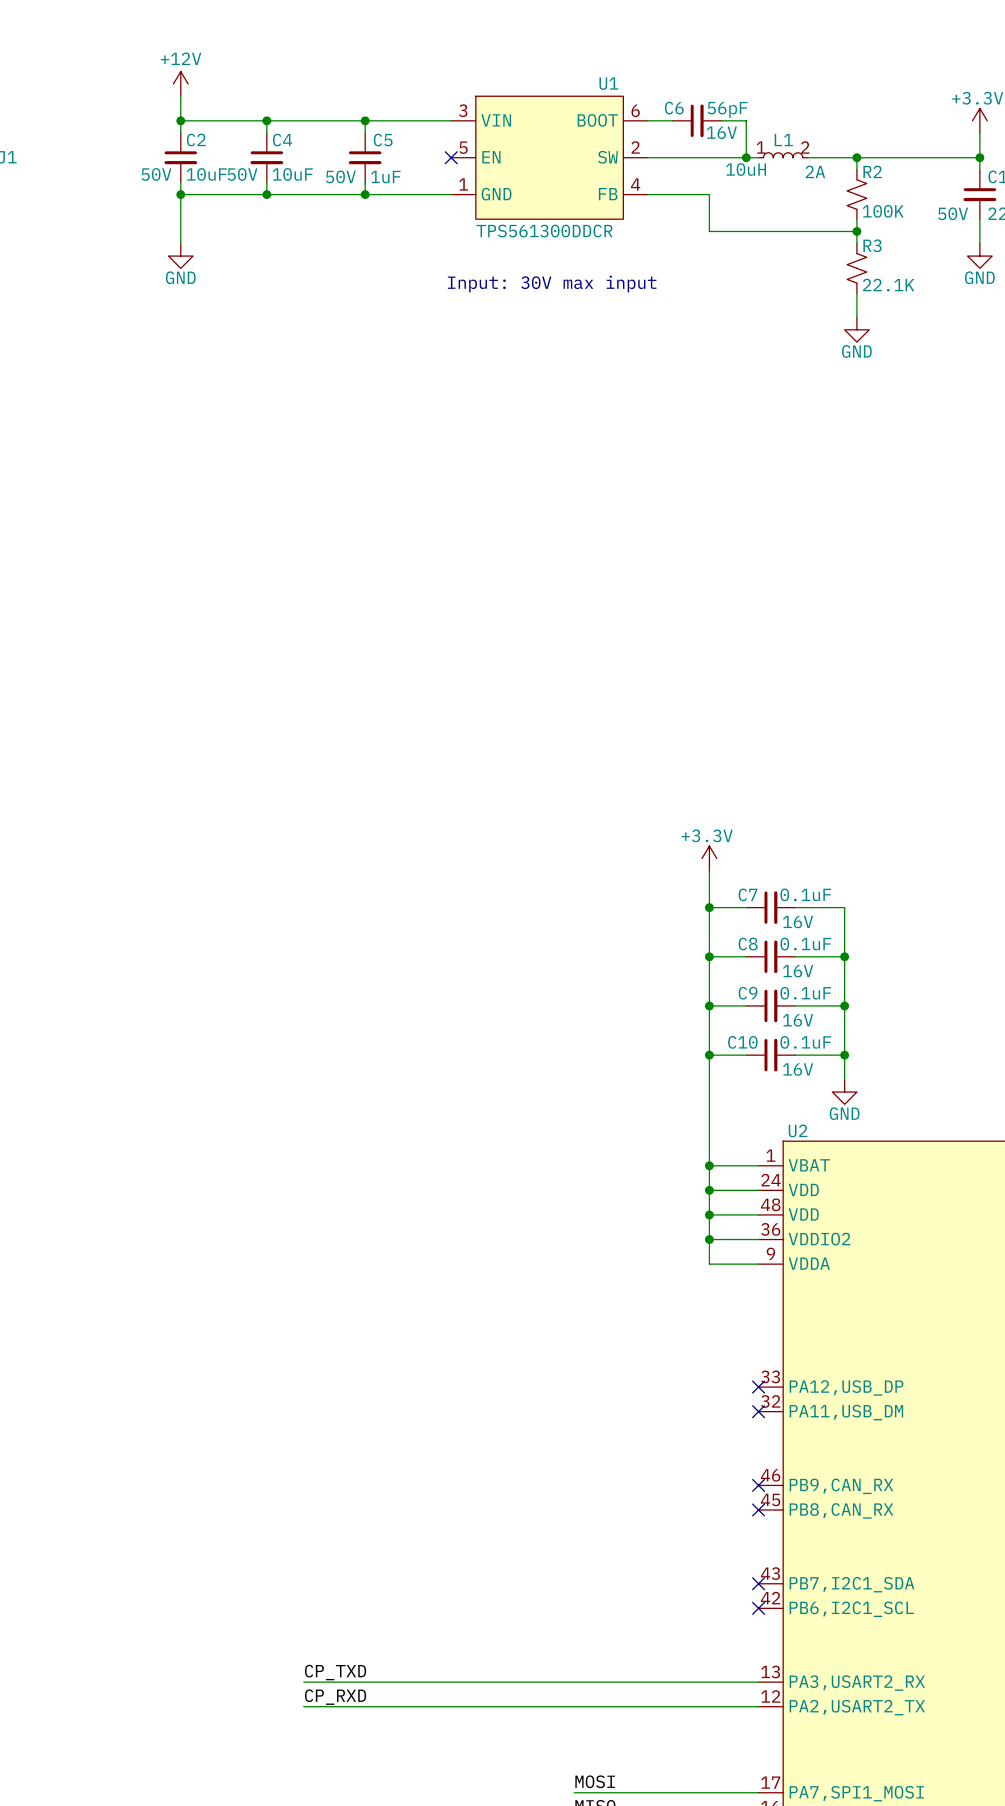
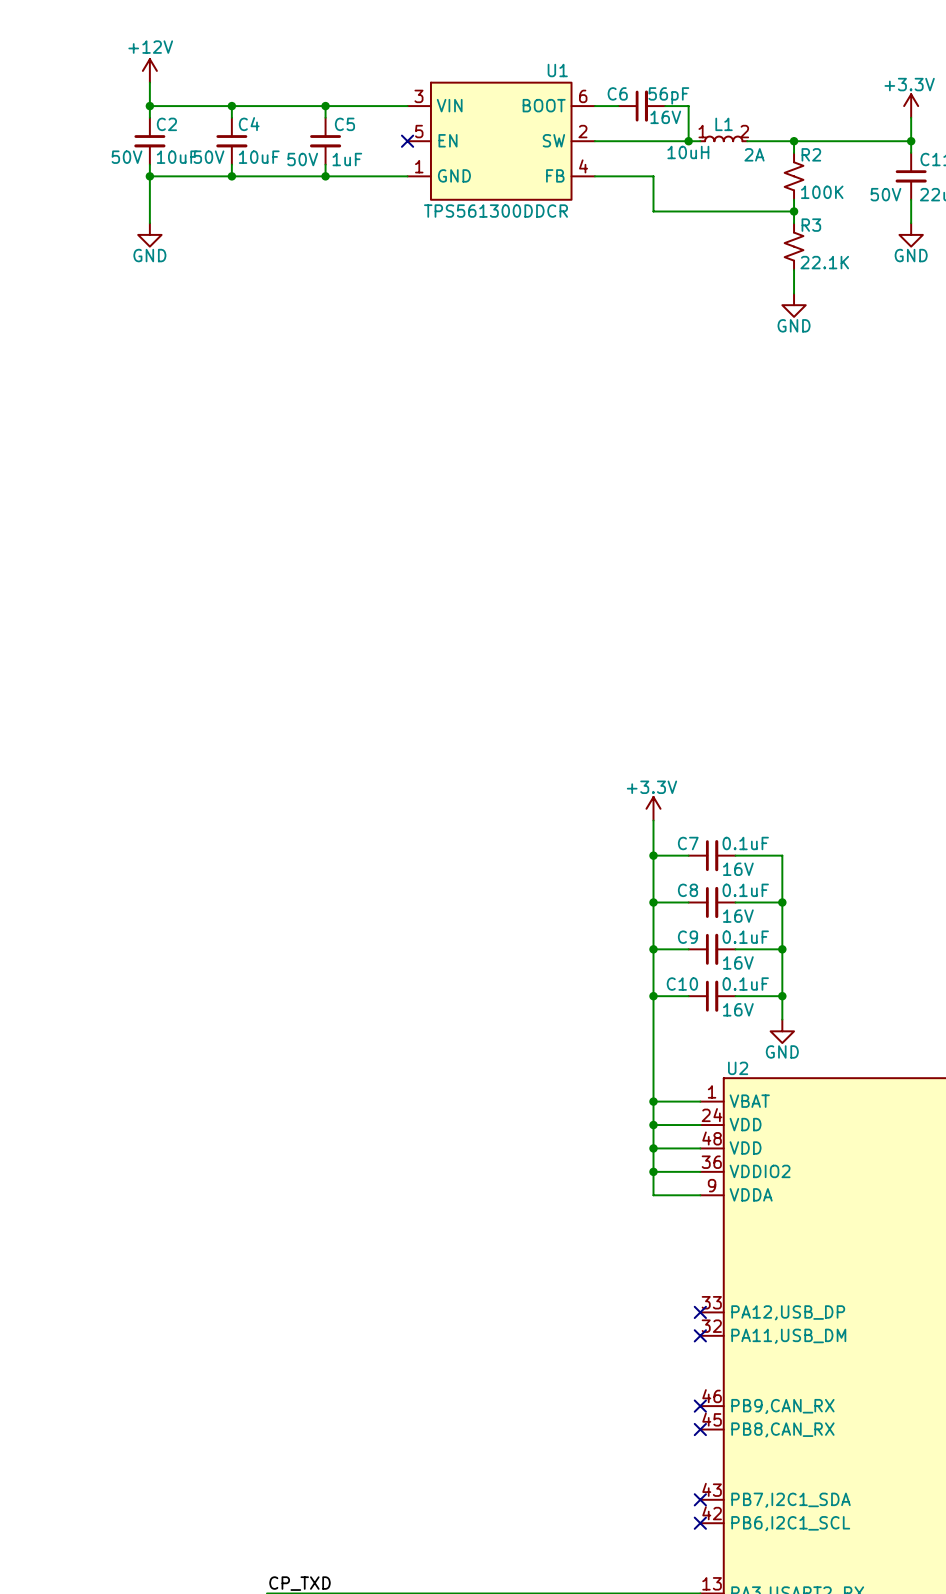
text: Input: 30V max input (552, 284) -> none

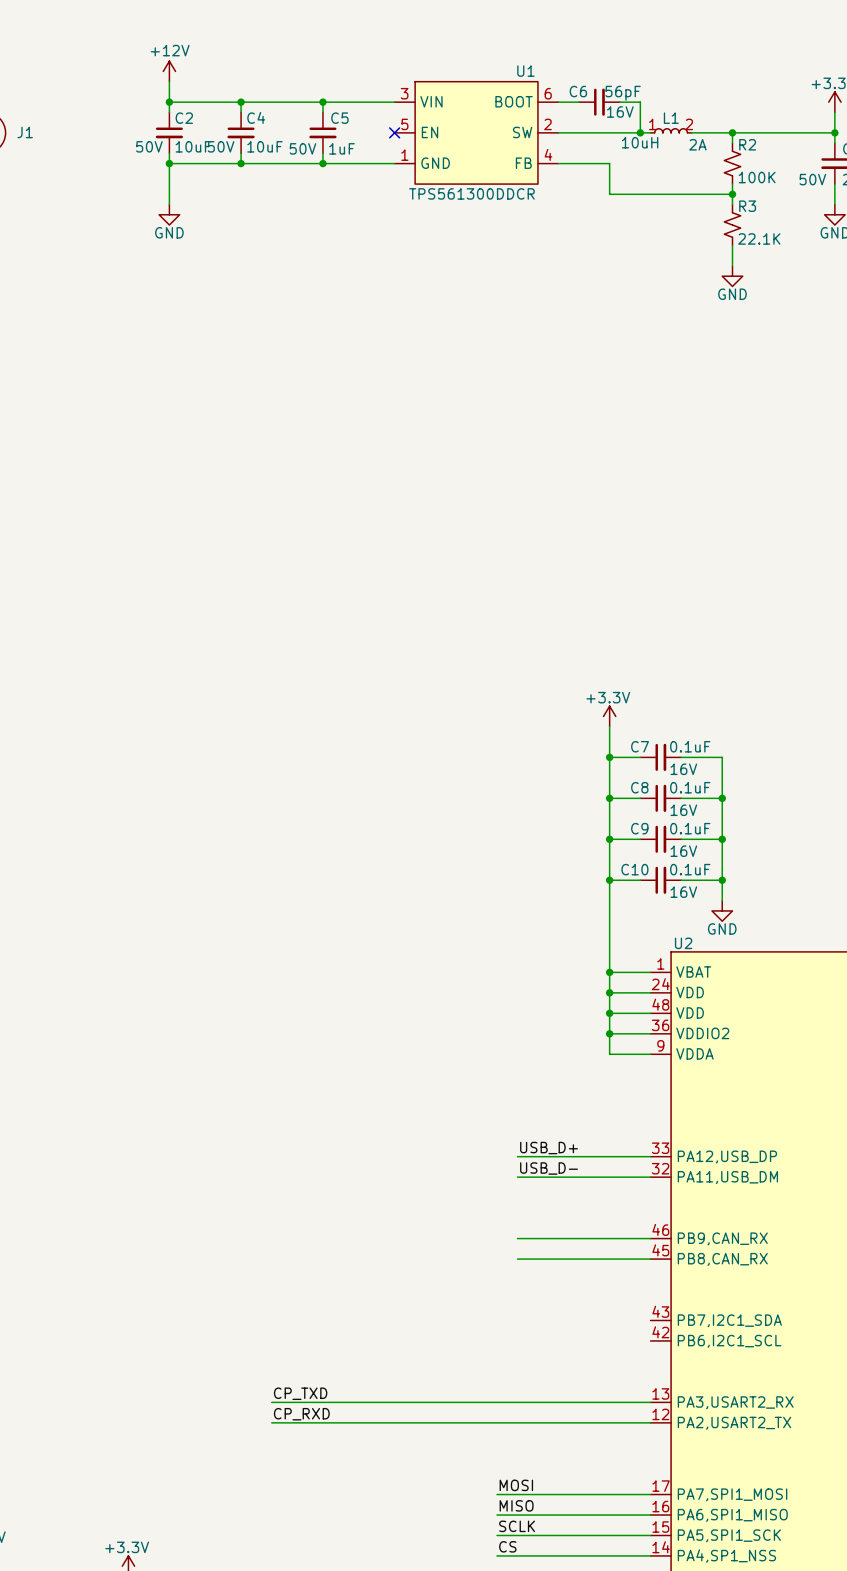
label: none -> USB_D+ (549, 1148)
wire: none -> (517, 1156) (650, 1156)
no-connect mark: (700, 1312) -> none
label: none -> USB_D- (549, 1168)
wire: none -> (517, 1177) (650, 1177)
no-connect mark: (700, 1335) -> none
wire: none -> (517, 1238) (650, 1238)
no-connect mark: (700, 1406) -> none
wire: none -> (517, 1259) (650, 1259)
no-connect mark: (700, 1429) -> none
no-connect mark: (700, 1499) -> none
no-connect mark: (700, 1523) -> none

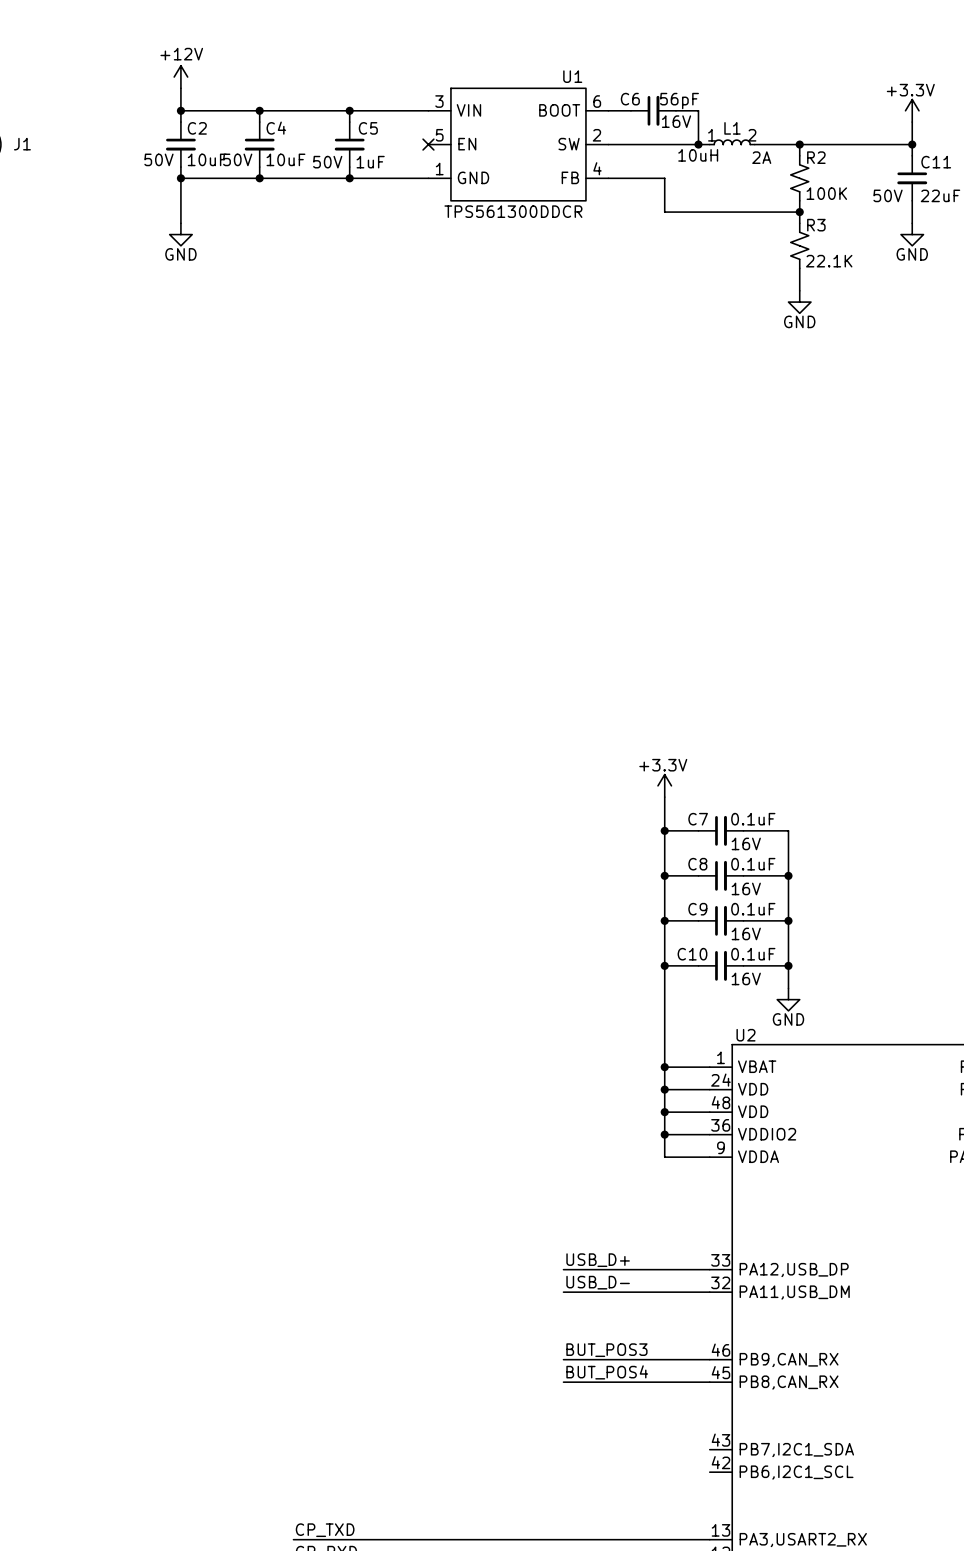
label: none -> BUT_POS3 (606, 1350)
label: none -> BUT_POS4 (607, 1372)

